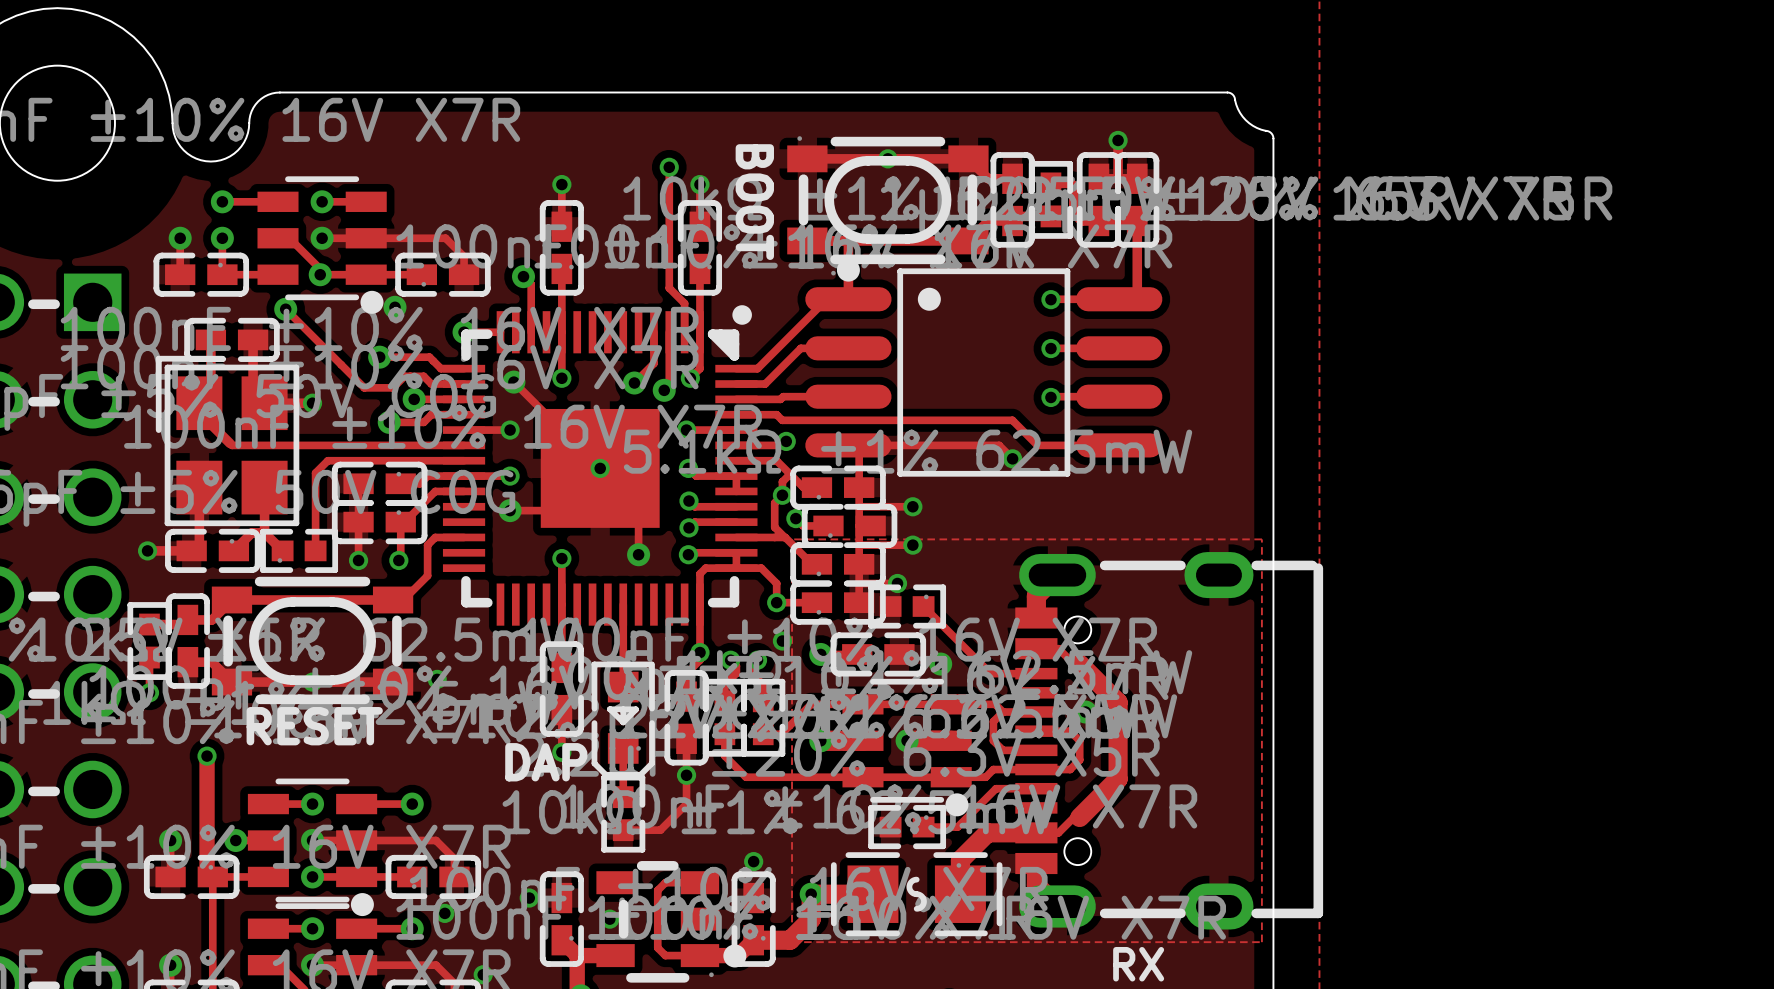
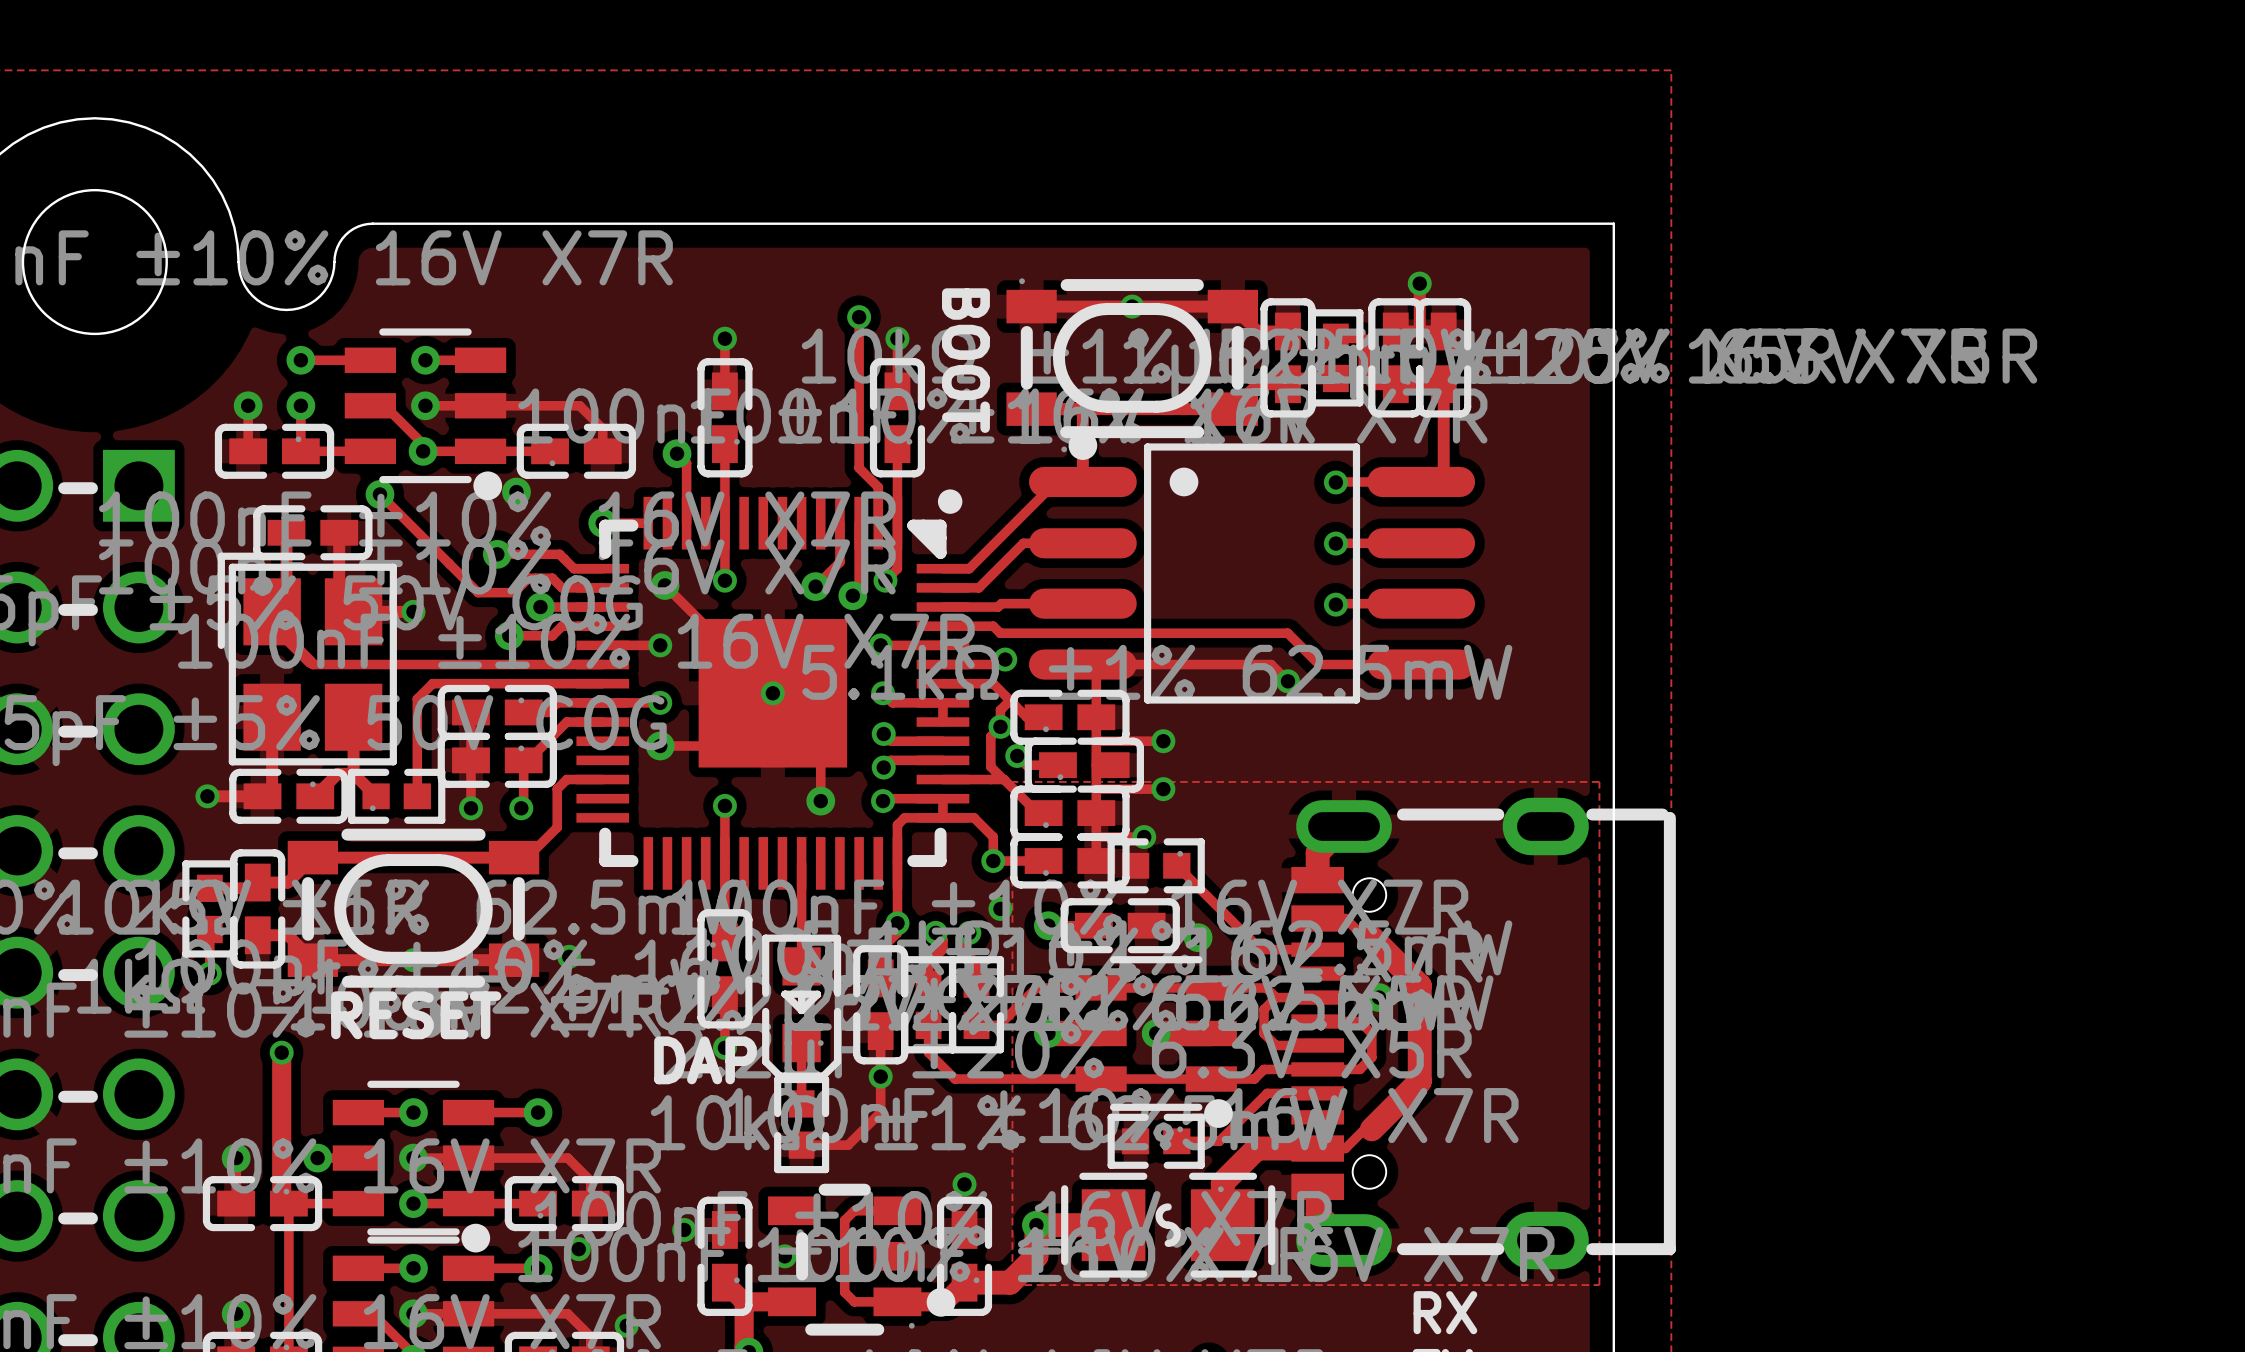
board edge: (1227, 92) (1234, 96) (1237, 108) (1245, 120) (1257, 128) (1269, 132) (1273, 138) -> (1556, 223) (1613, 223) (1613, 281)

